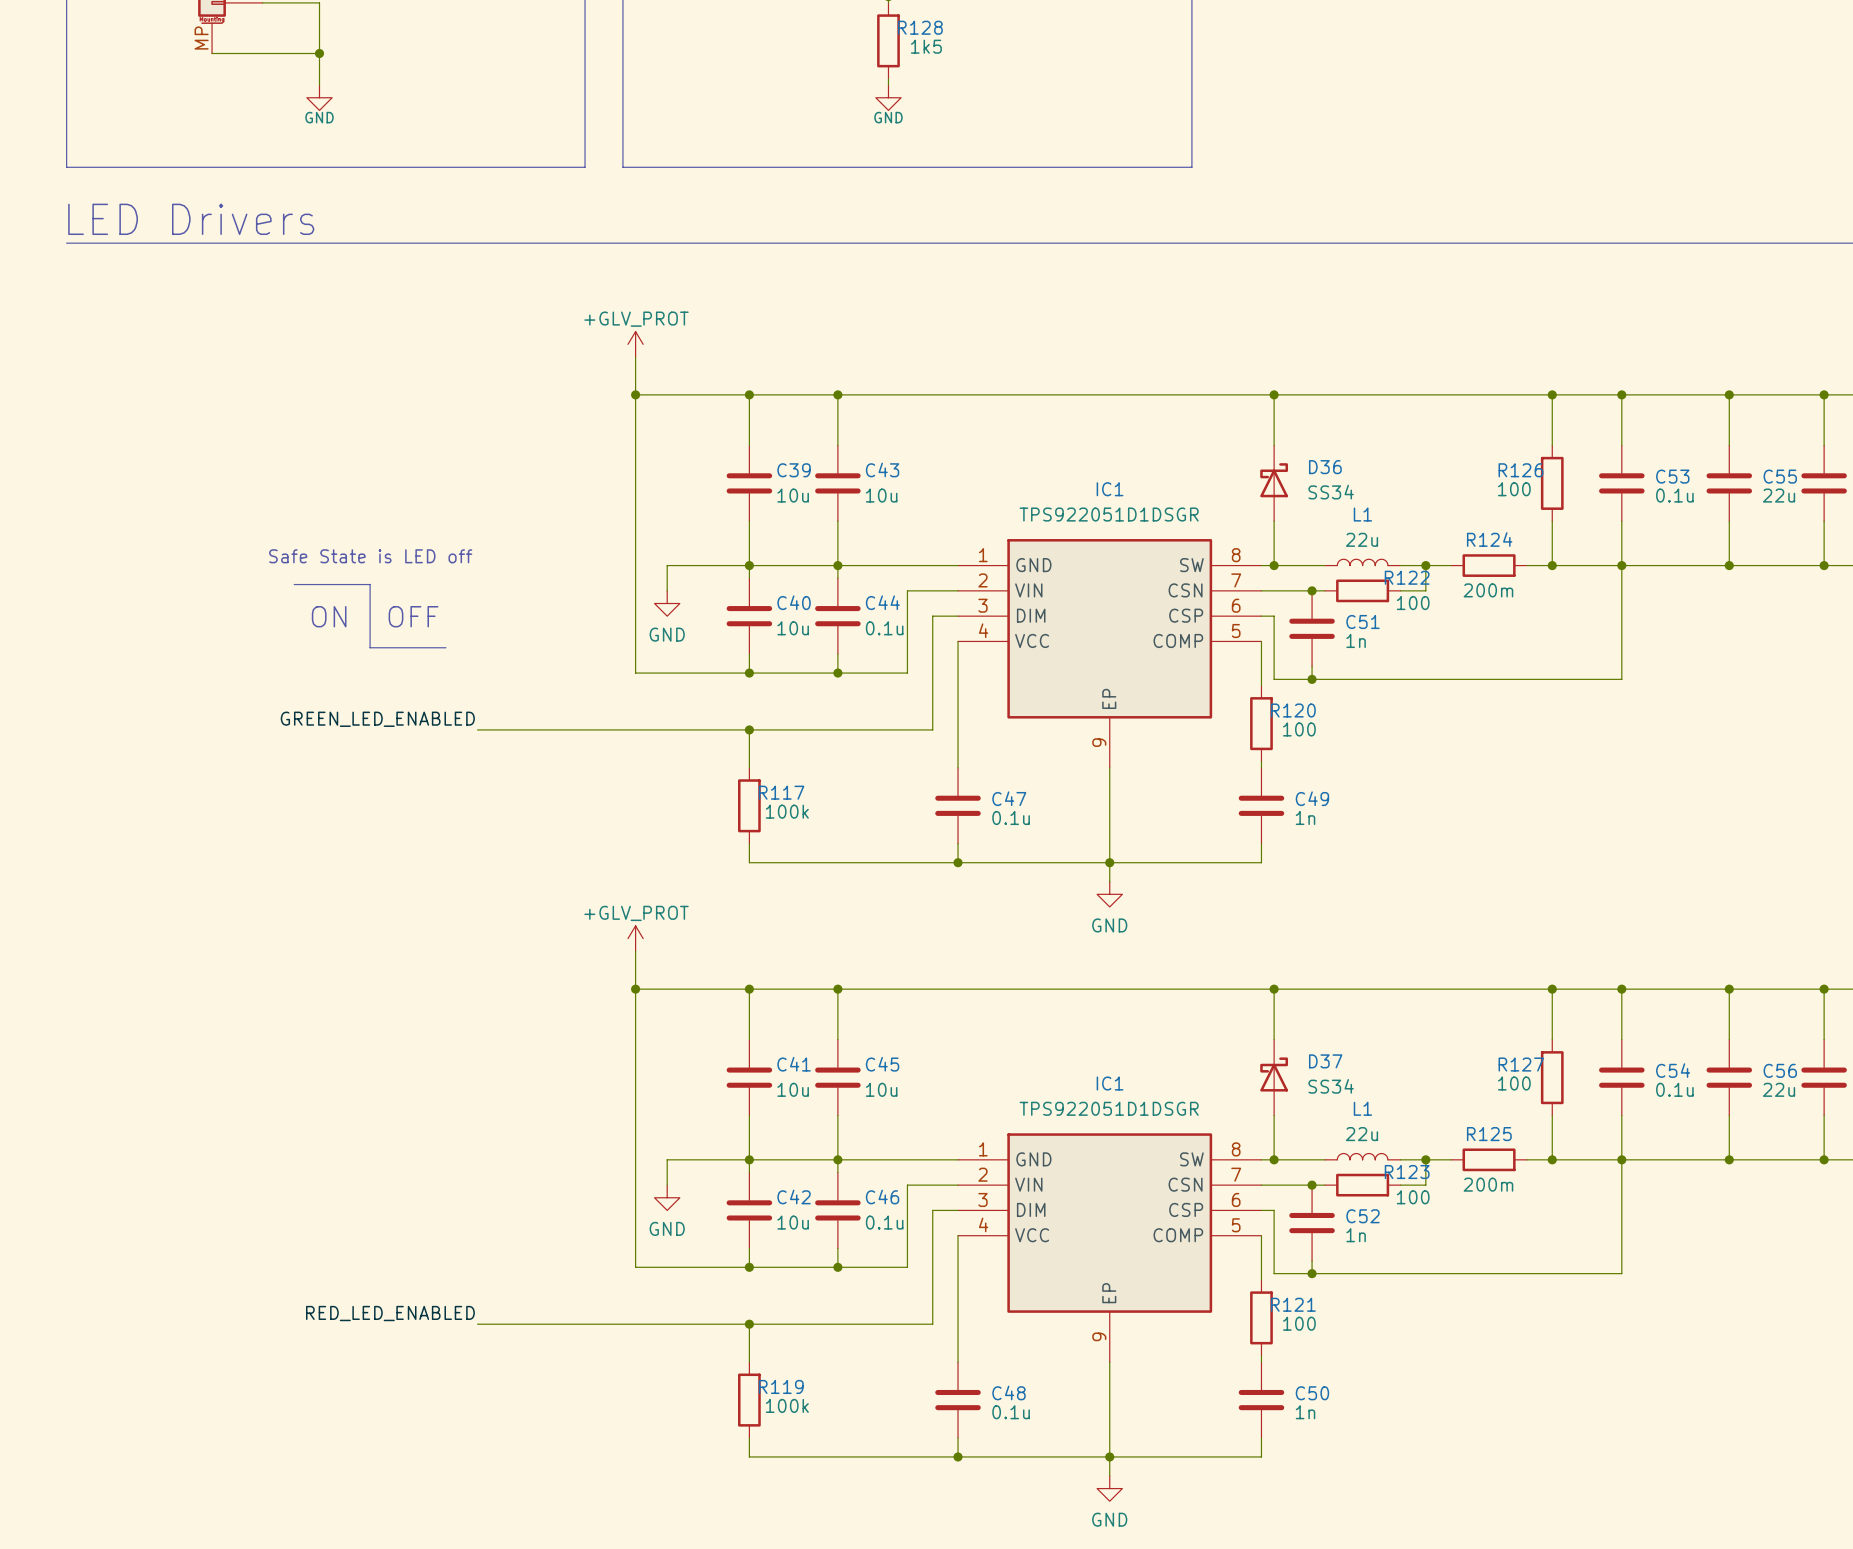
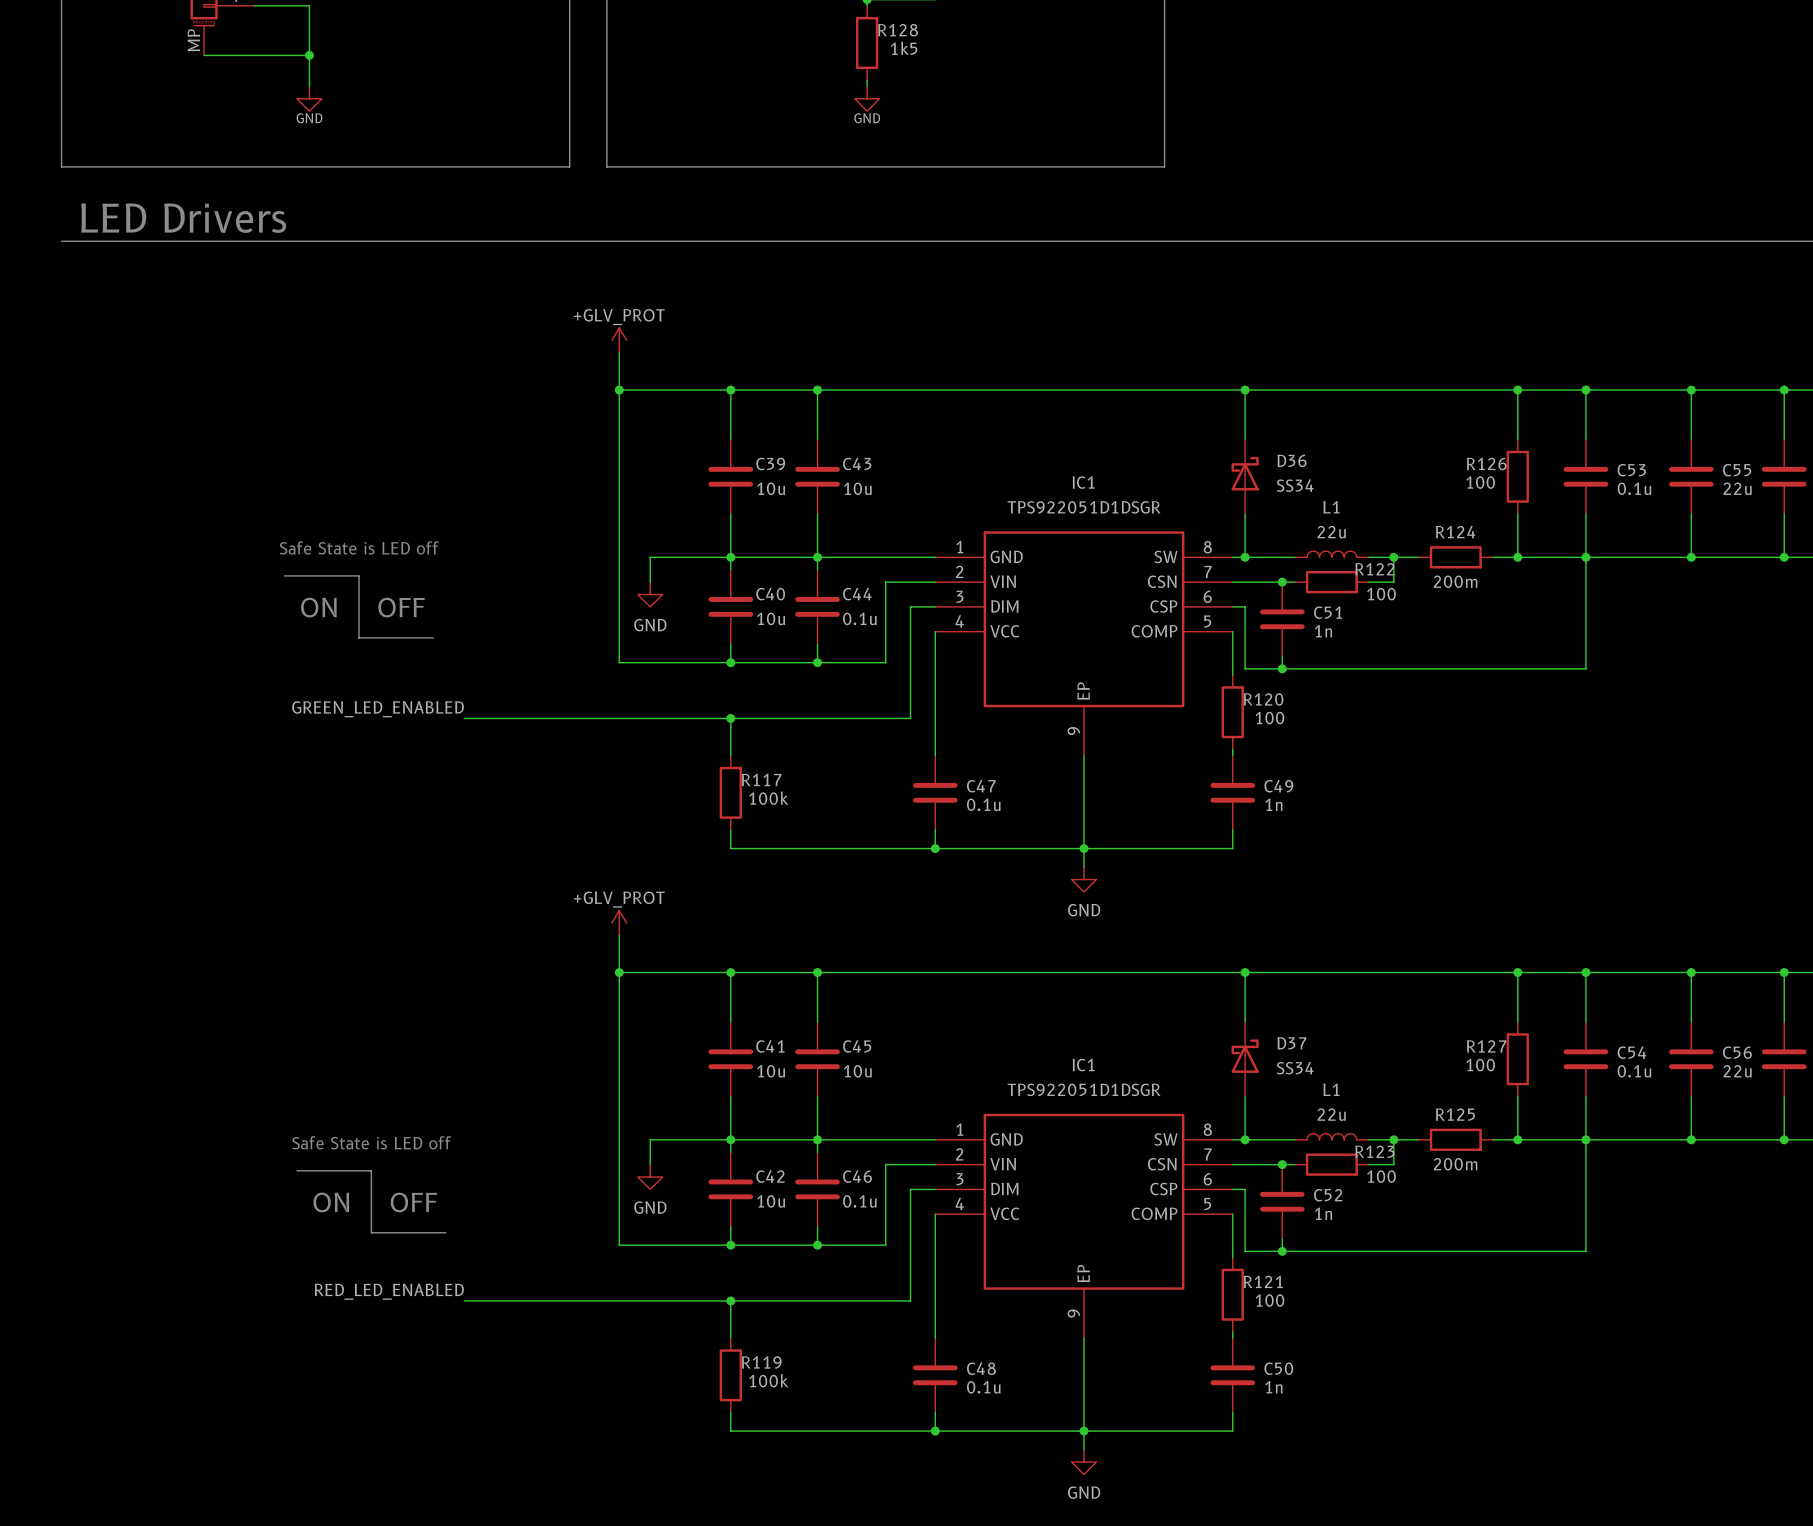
text: none -> Safe State is LED off (371, 1142)
line: none -> (297, 1170) (371, 1170) (371, 1232) (445, 1232)
text: none -> ON (331, 1202)
text: none -> OFF (413, 1202)

